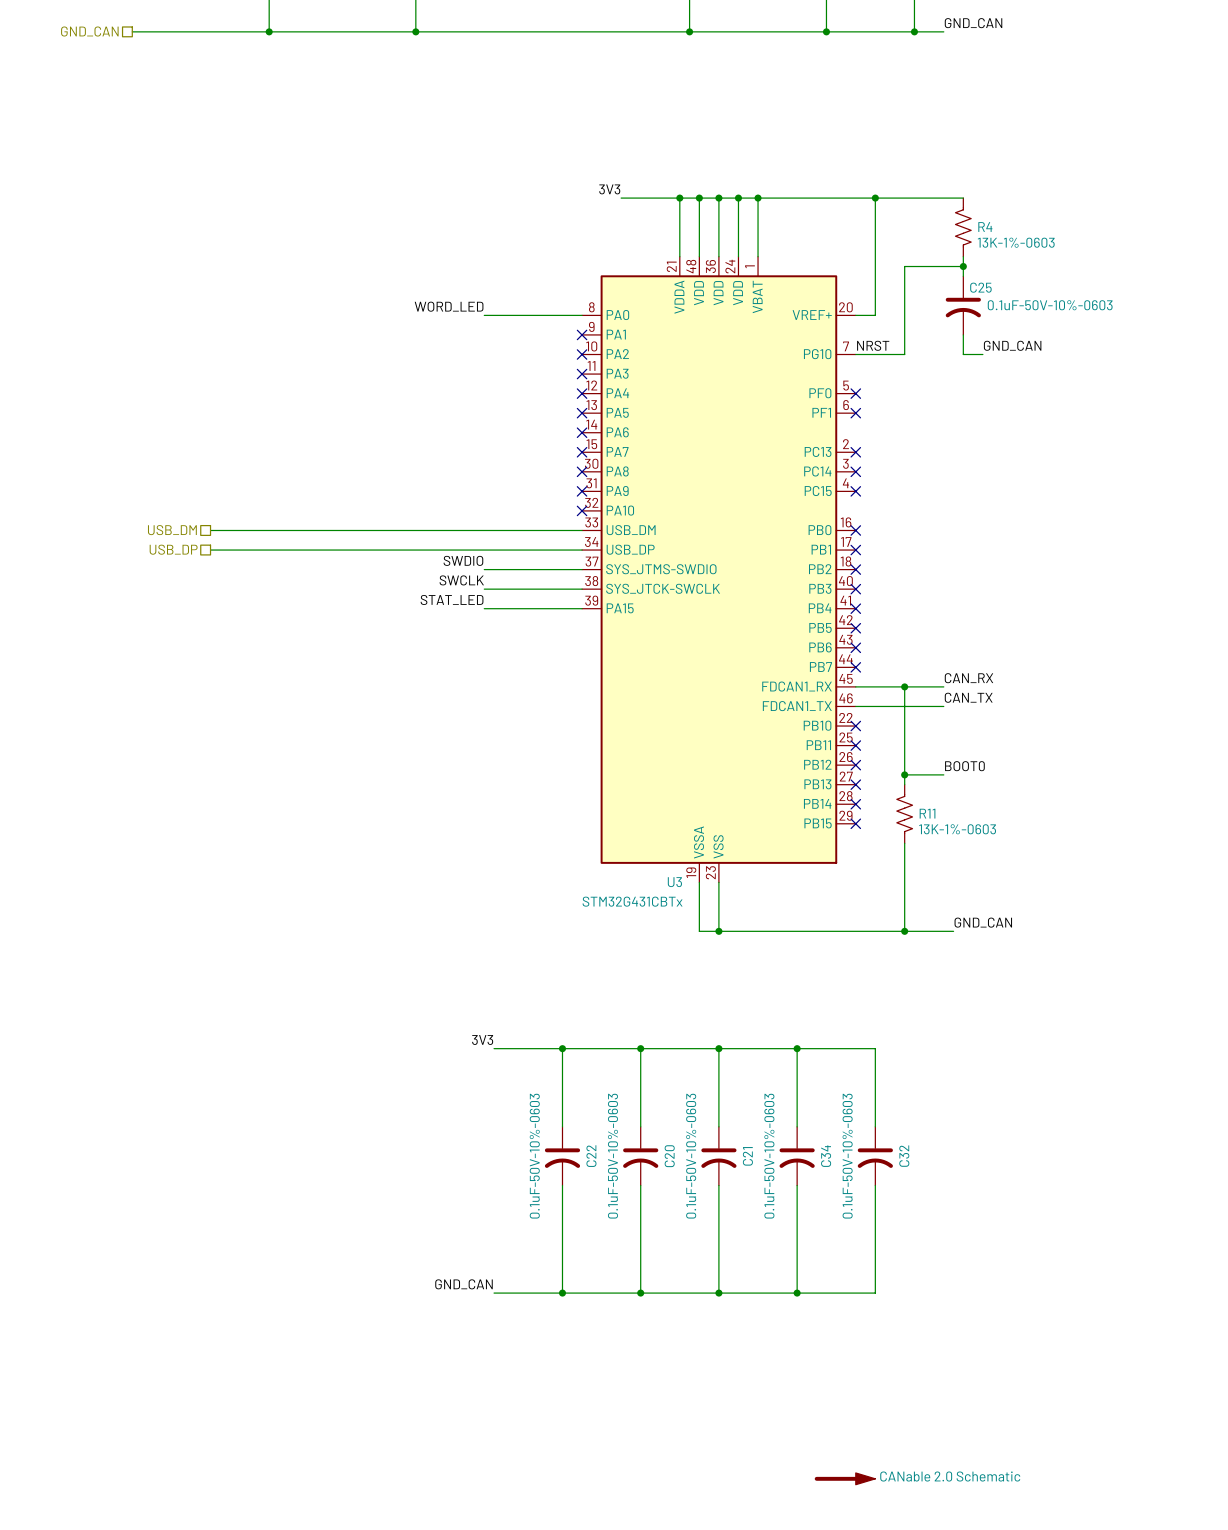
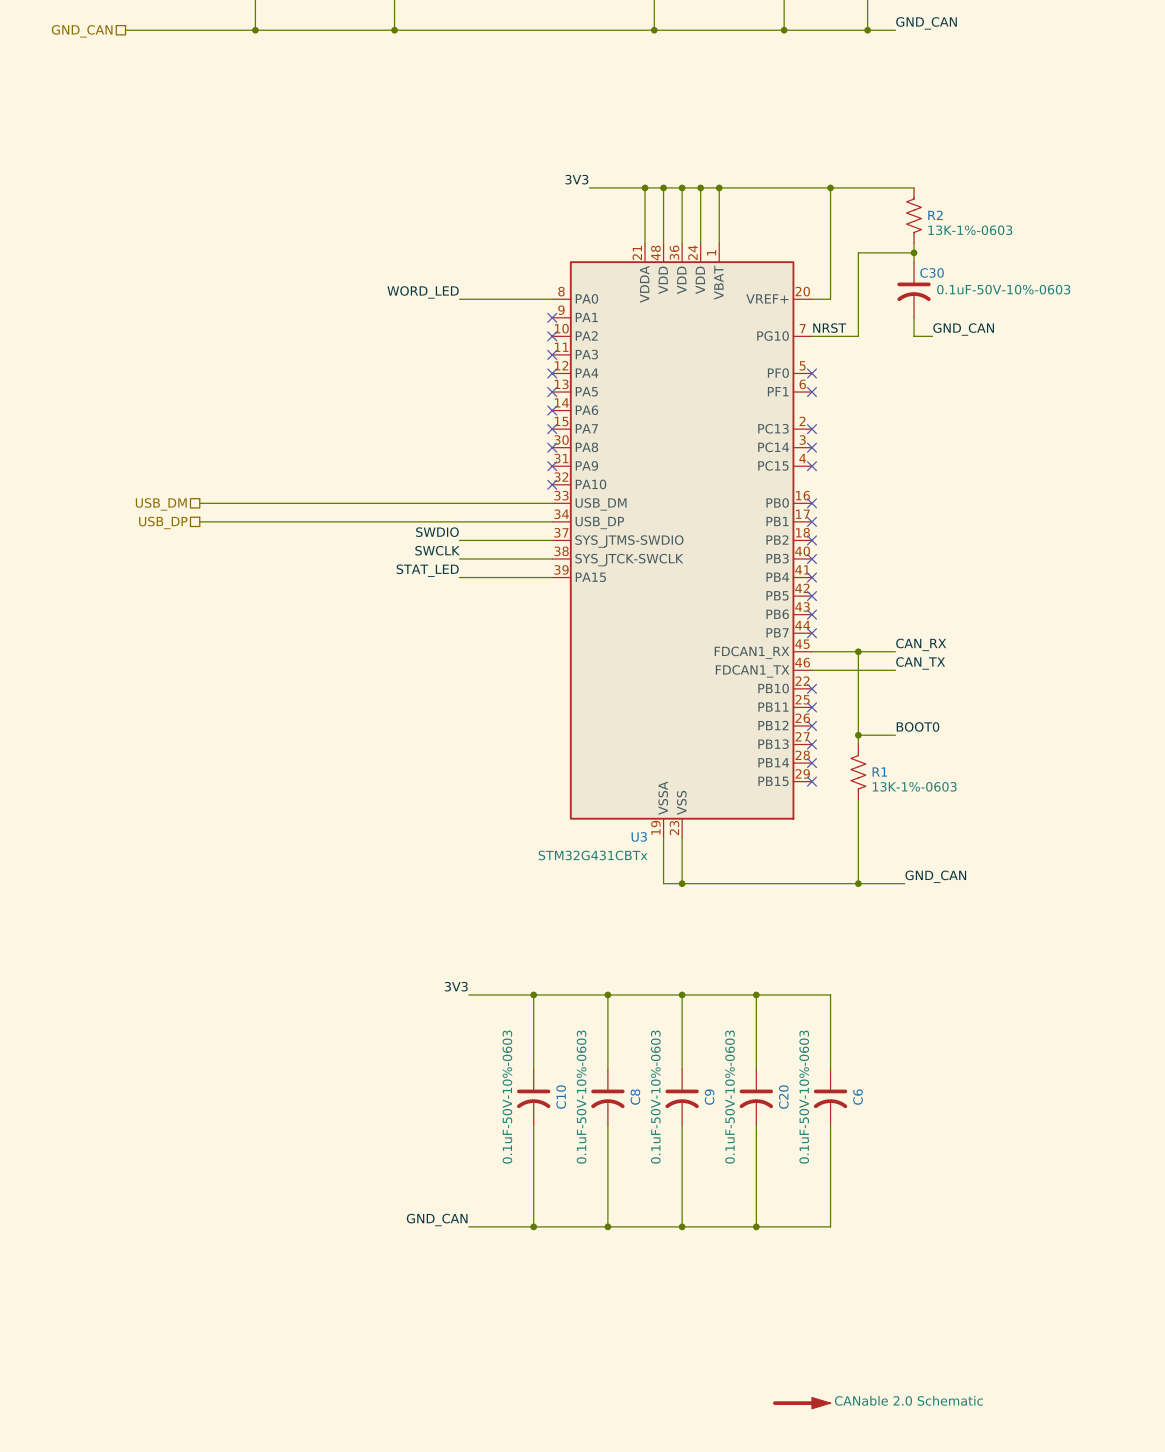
R4 name: R4 (985, 227) -> R2 (935, 215)
C25 name: C25 (980, 287) -> C30 (932, 272)
R11 name: R11 (927, 813) -> R1 (879, 772)
C22 name: C22 (591, 1156) -> C10 (561, 1097)
C20 name: C20 (669, 1156) -> C8 (635, 1097)
C21 name: C21 (747, 1156) -> C9 (709, 1097)
C34 name: C34 (826, 1156) -> C20 (783, 1097)
C32 name: C32 (904, 1156) -> C6 (858, 1097)

